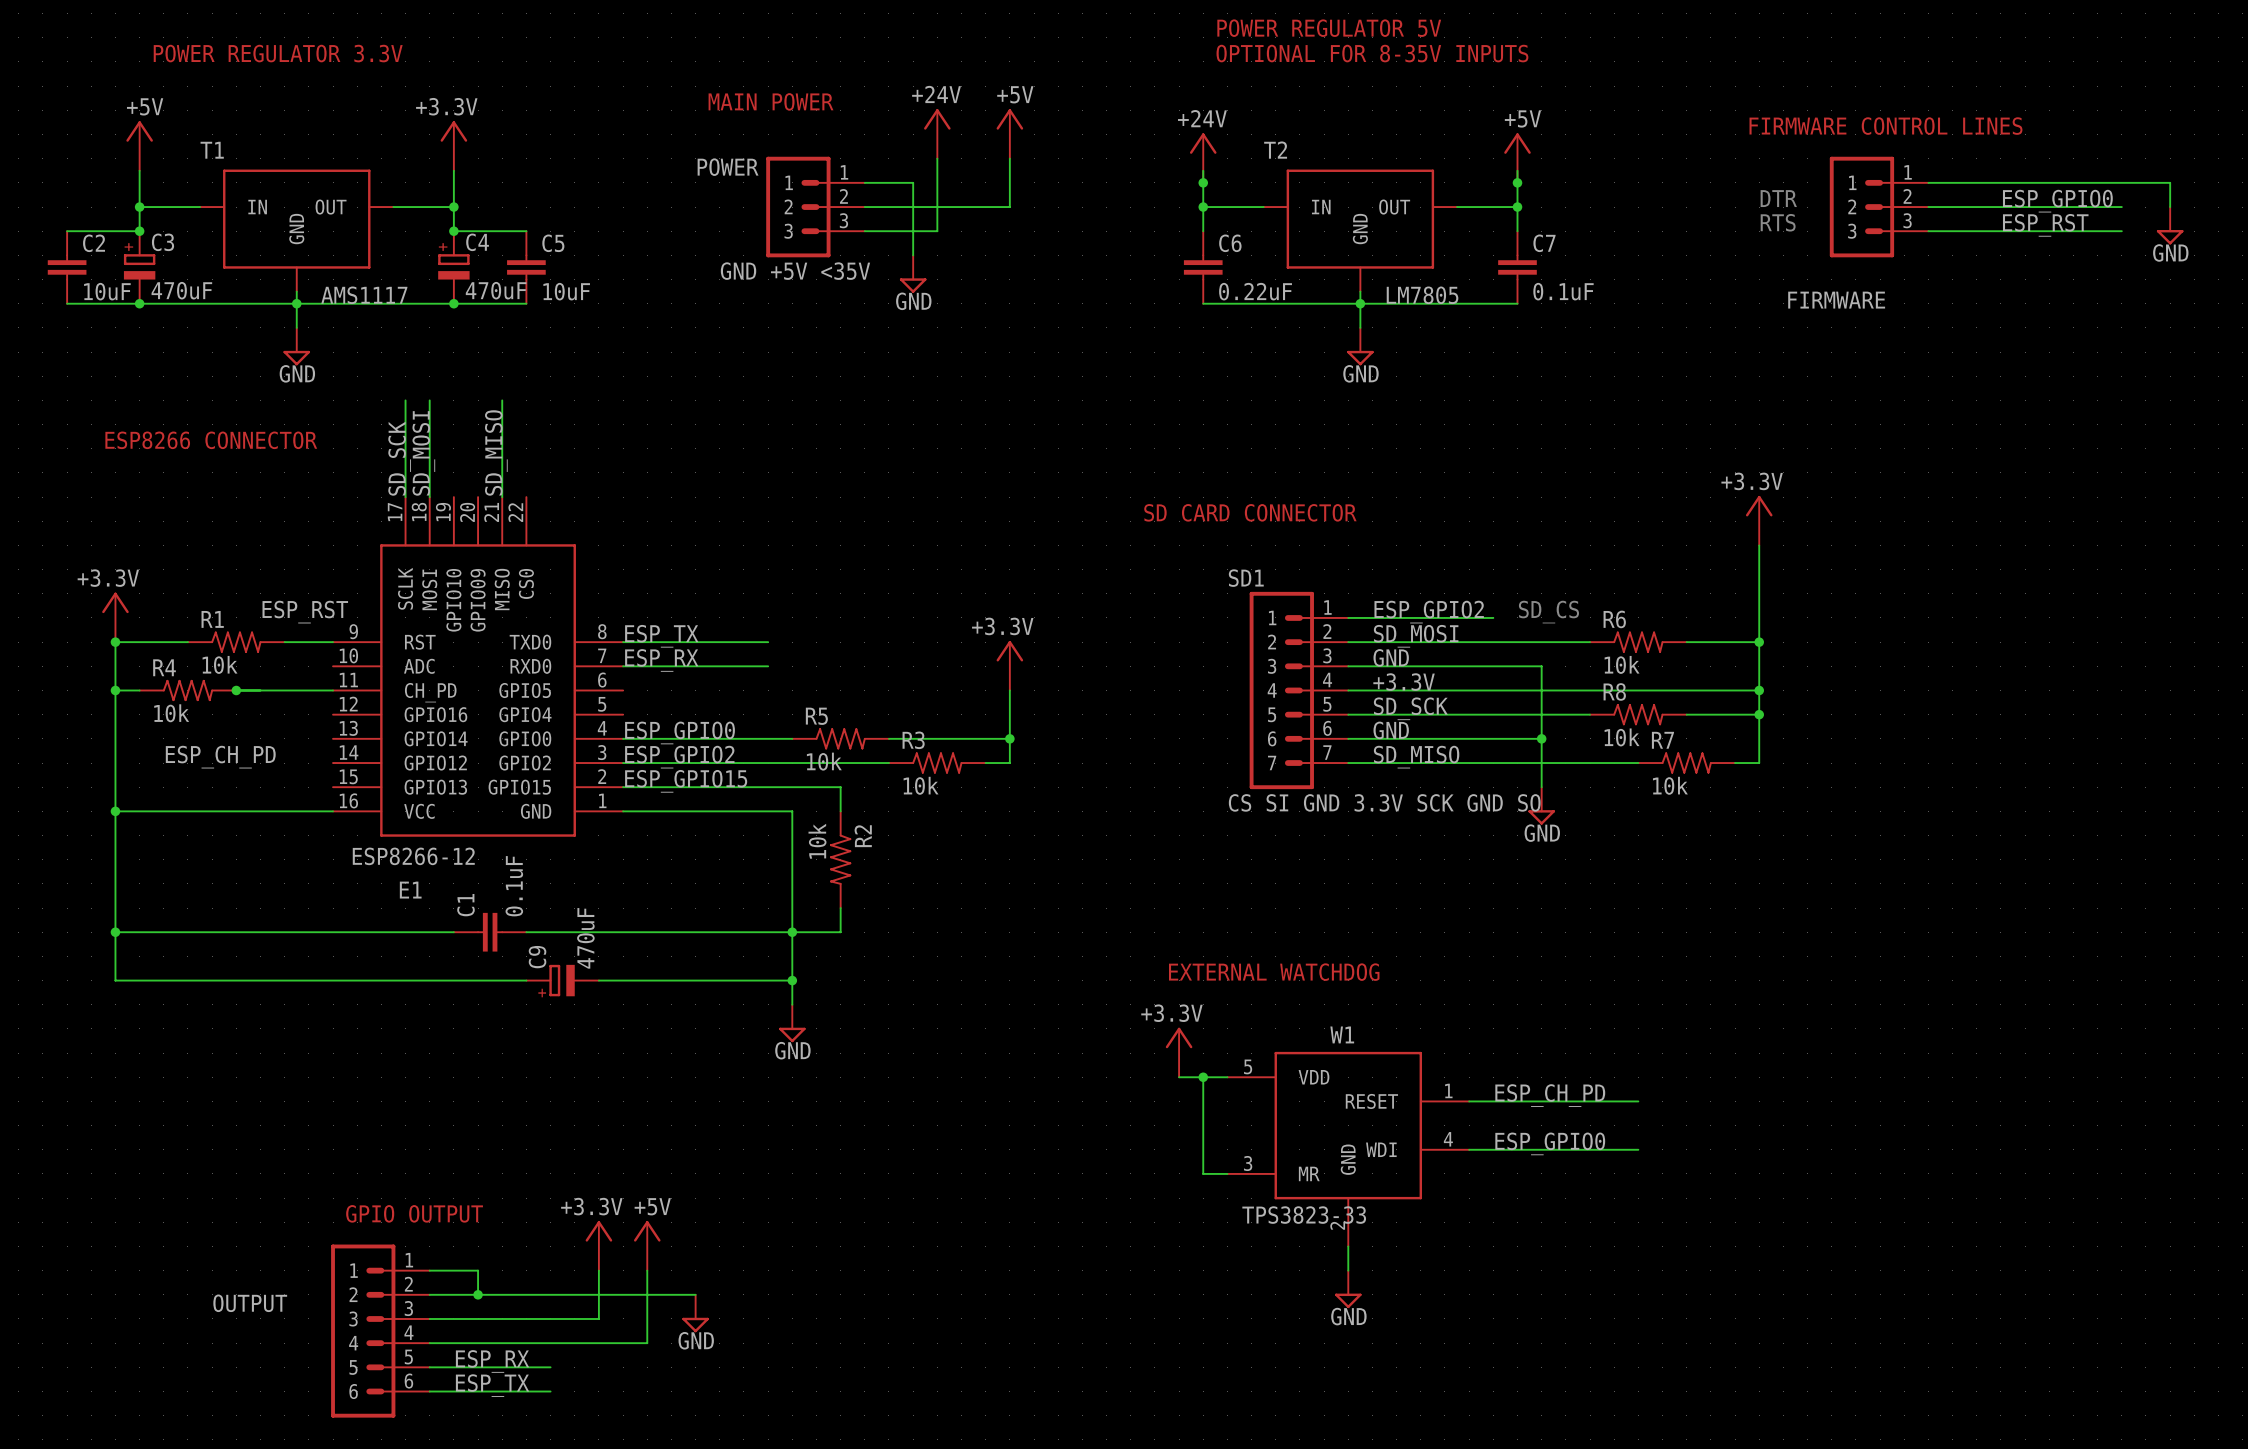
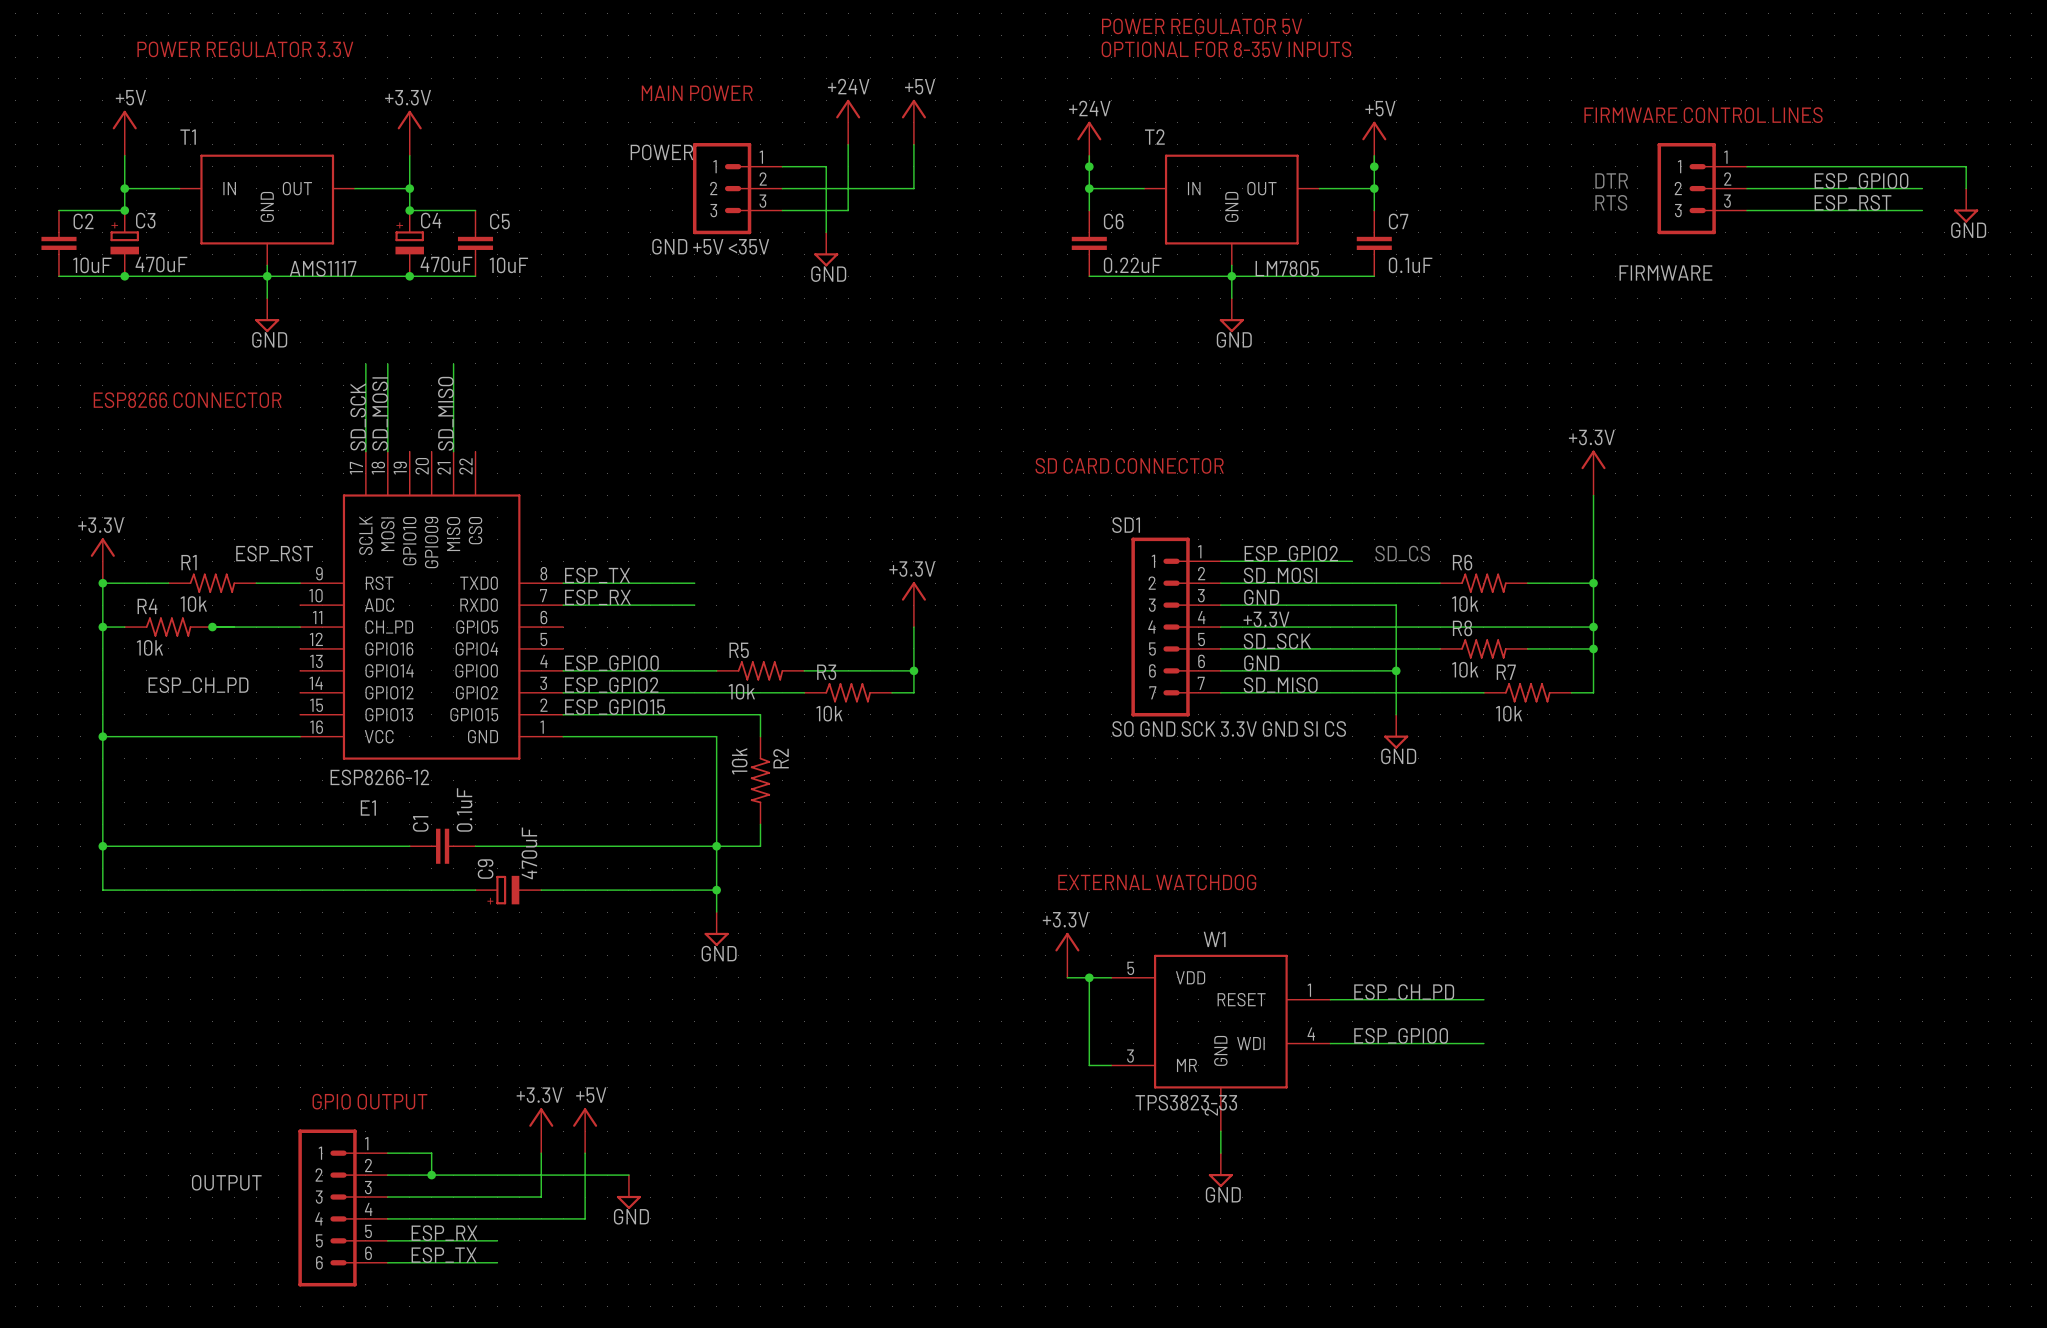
SD1 value: CS SI GND 3.3V SCK GND SO (1384, 802) -> SO GND SCK 3.3V GND SI CS (1229, 728)

